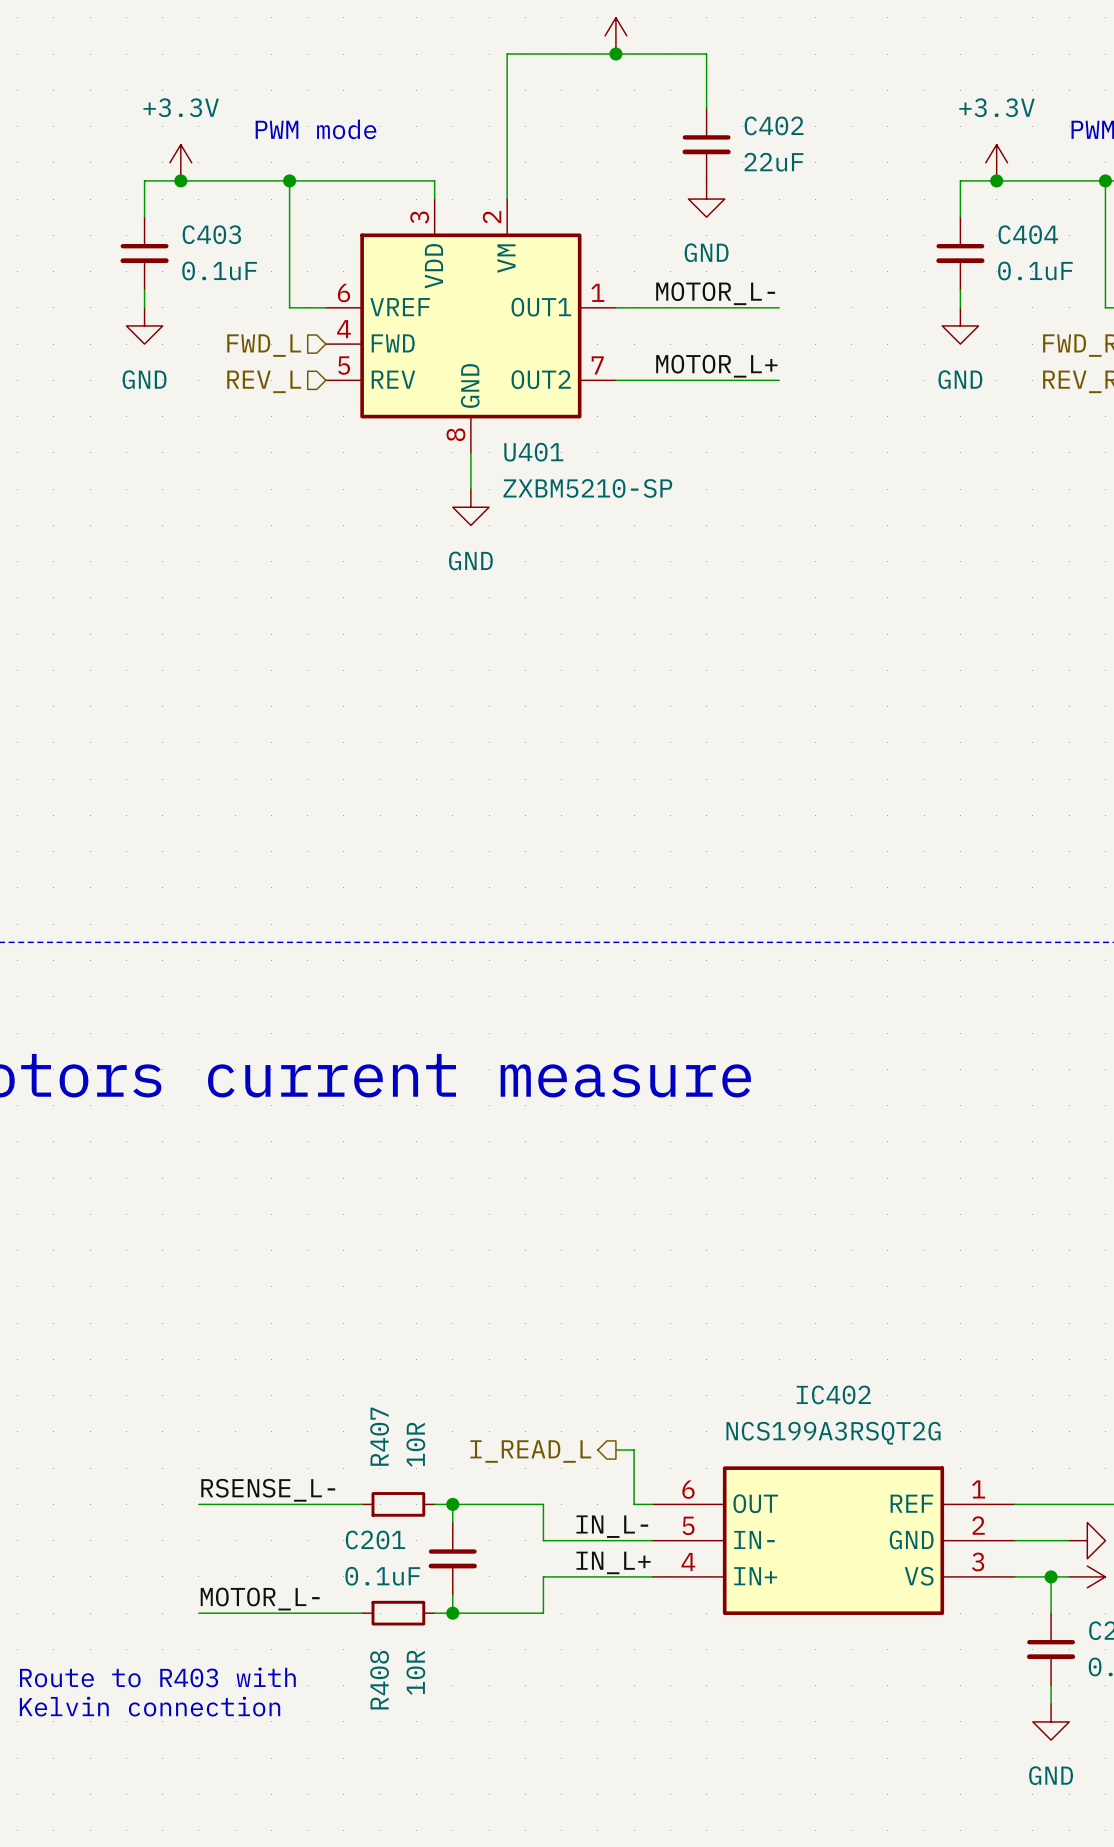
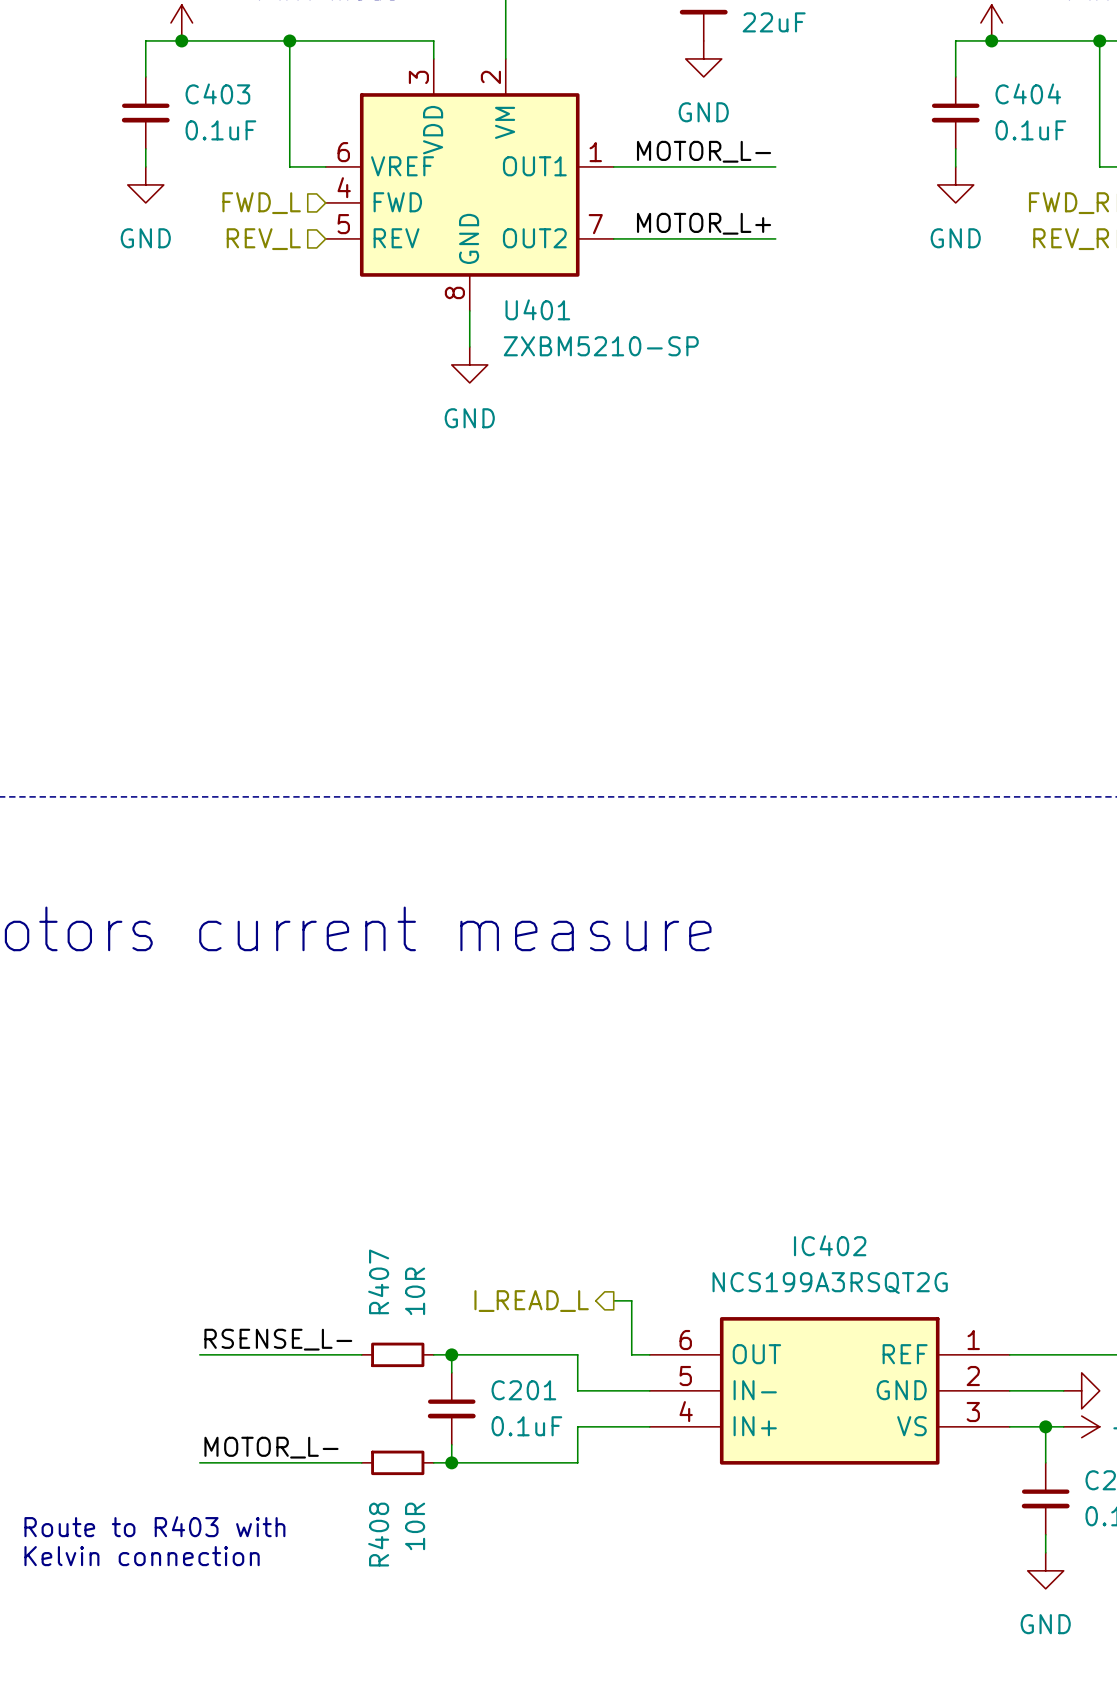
wire: (543, 1504) (543, 1540) (579, 1540) -> (541, 1354) (577, 1354) (577, 1390)
label: IN_L- (612, 1526) -> none
C201 name position: C201 (375, 1539) -> C201 (523, 1390)
label: IN_L+ (613, 1562) -> none
C201 value position: 0.1uF (382, 1576) -> 0.1uF (526, 1426)
wire: (579, 1576) (543, 1576) (543, 1613) -> (577, 1426) (577, 1462) (541, 1462)

